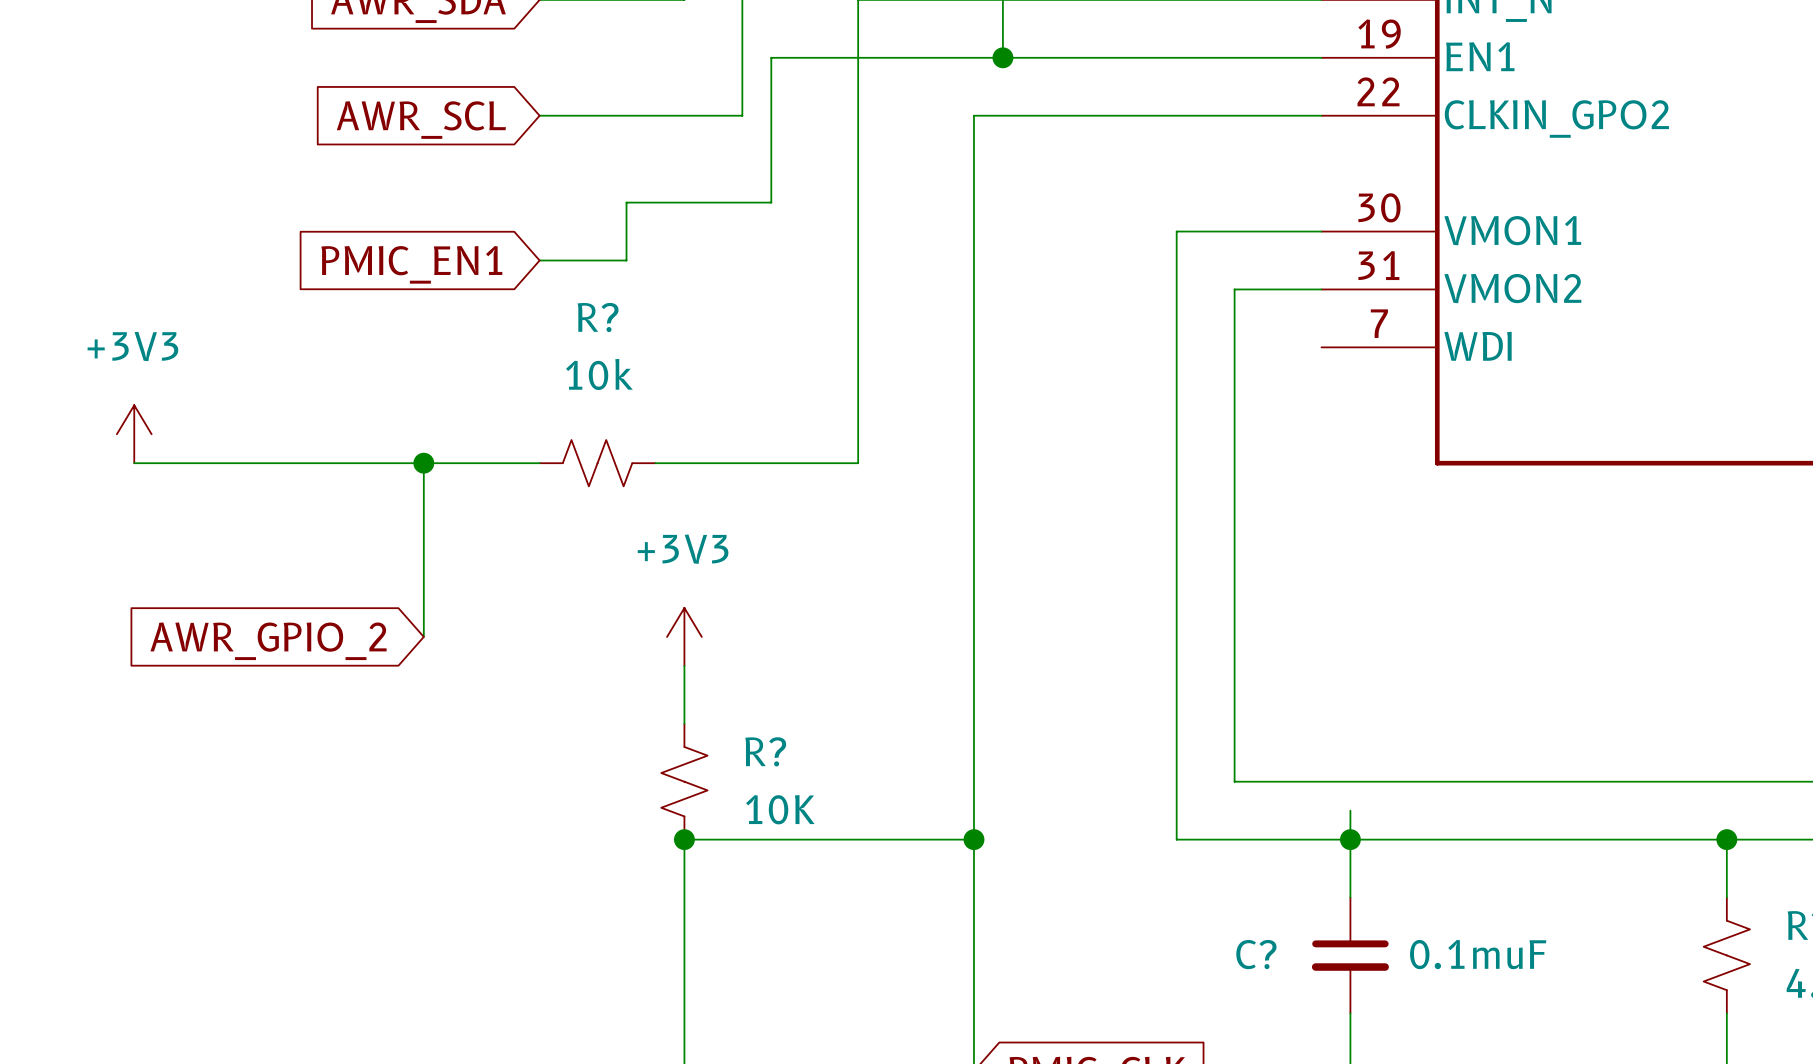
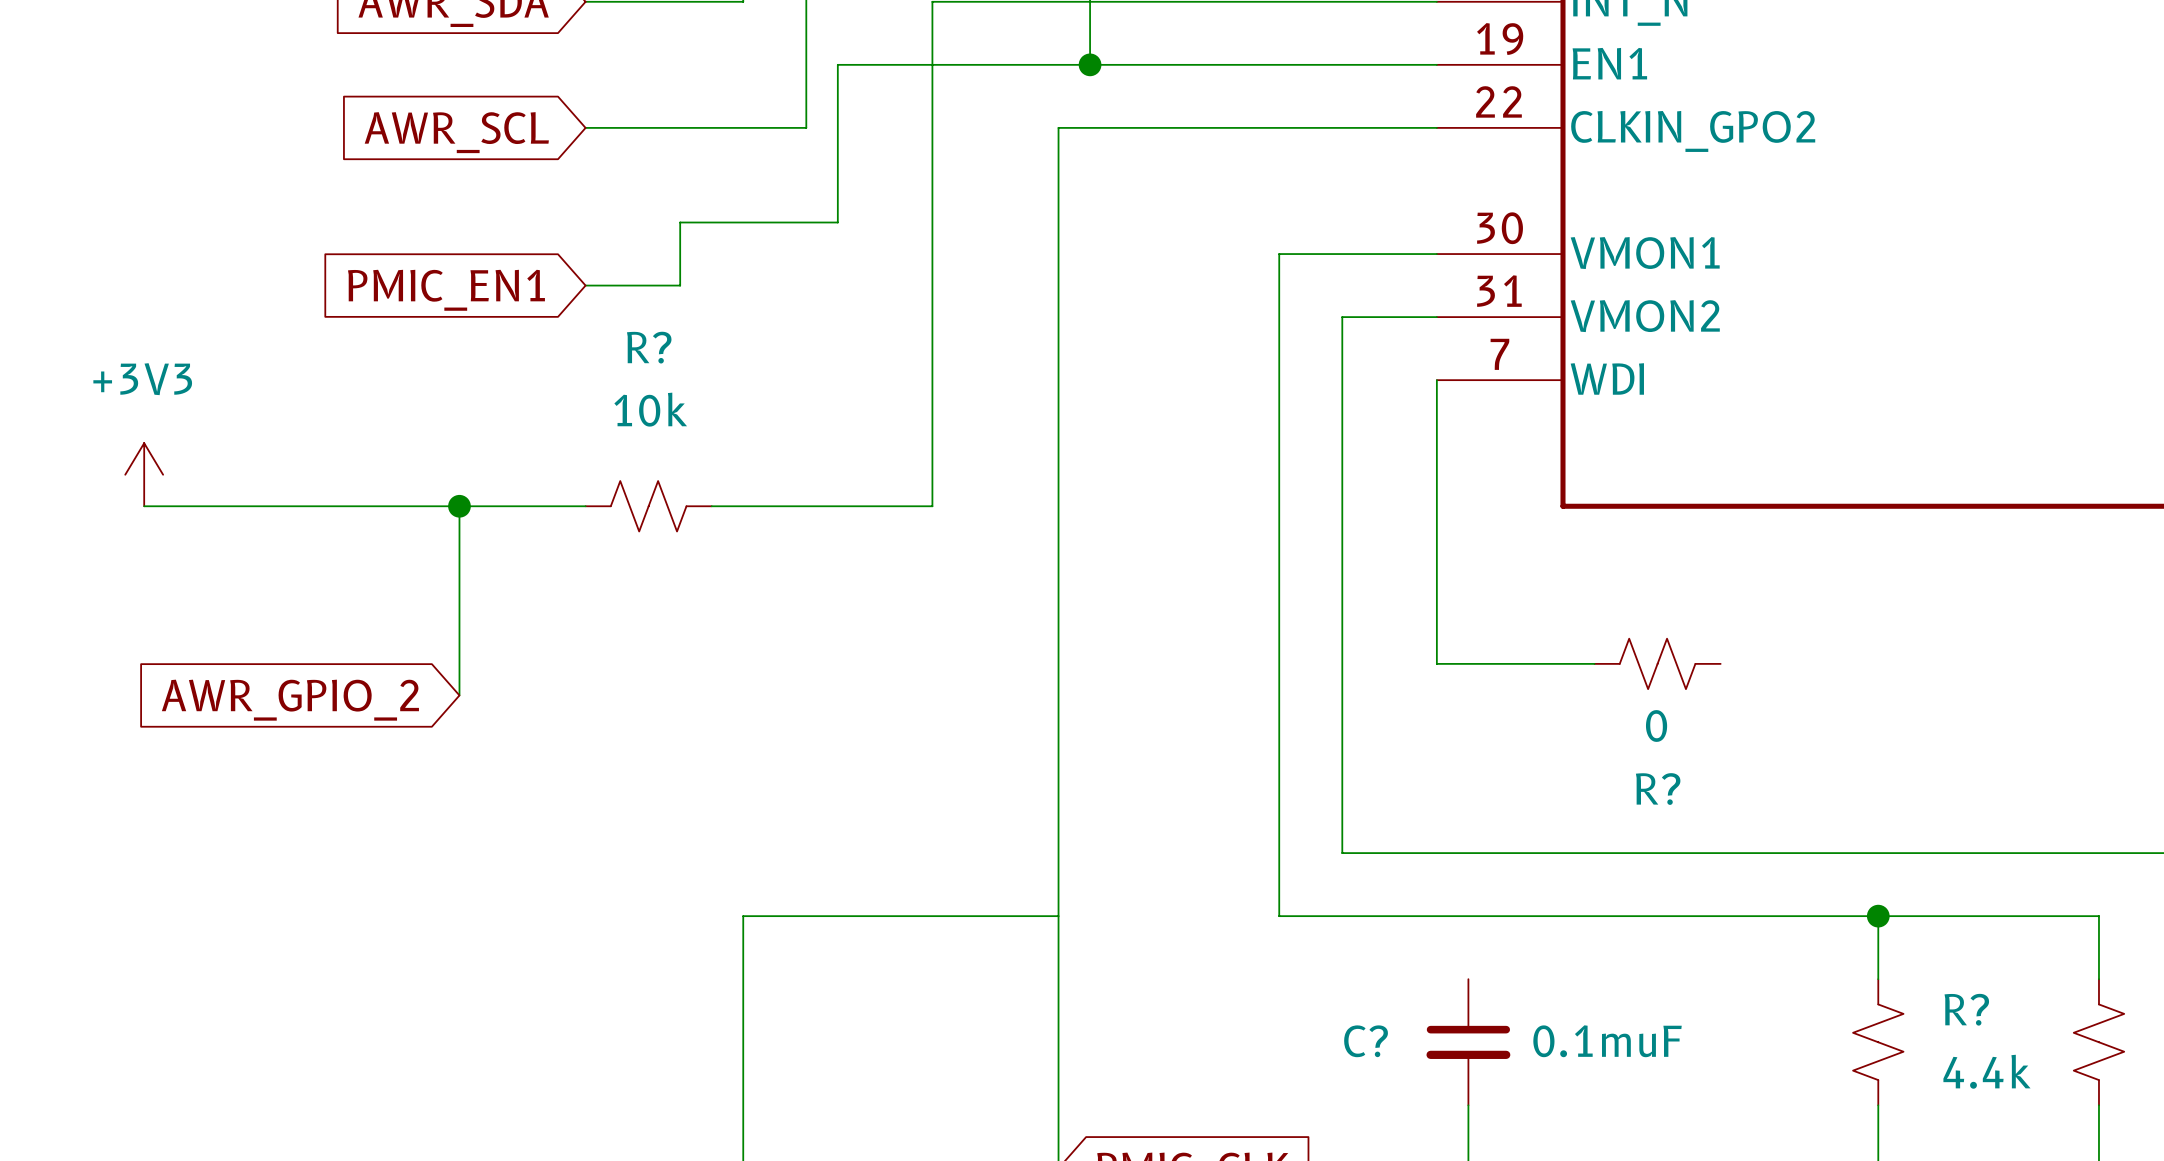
wire: none -> (1436, 380) (1436, 663) (1594, 663)
R?: none -> 0 (1657, 663)
power symbol: +3V3 (684, 636) -> none
wire: (684, 665) (684, 723) -> none
R?: 10K (684, 781) -> none
wire: (1350, 810) (1350, 897) -> none
junction: (684, 839) -> none
junction: (973, 839) -> none
junction: (1350, 839) -> none

